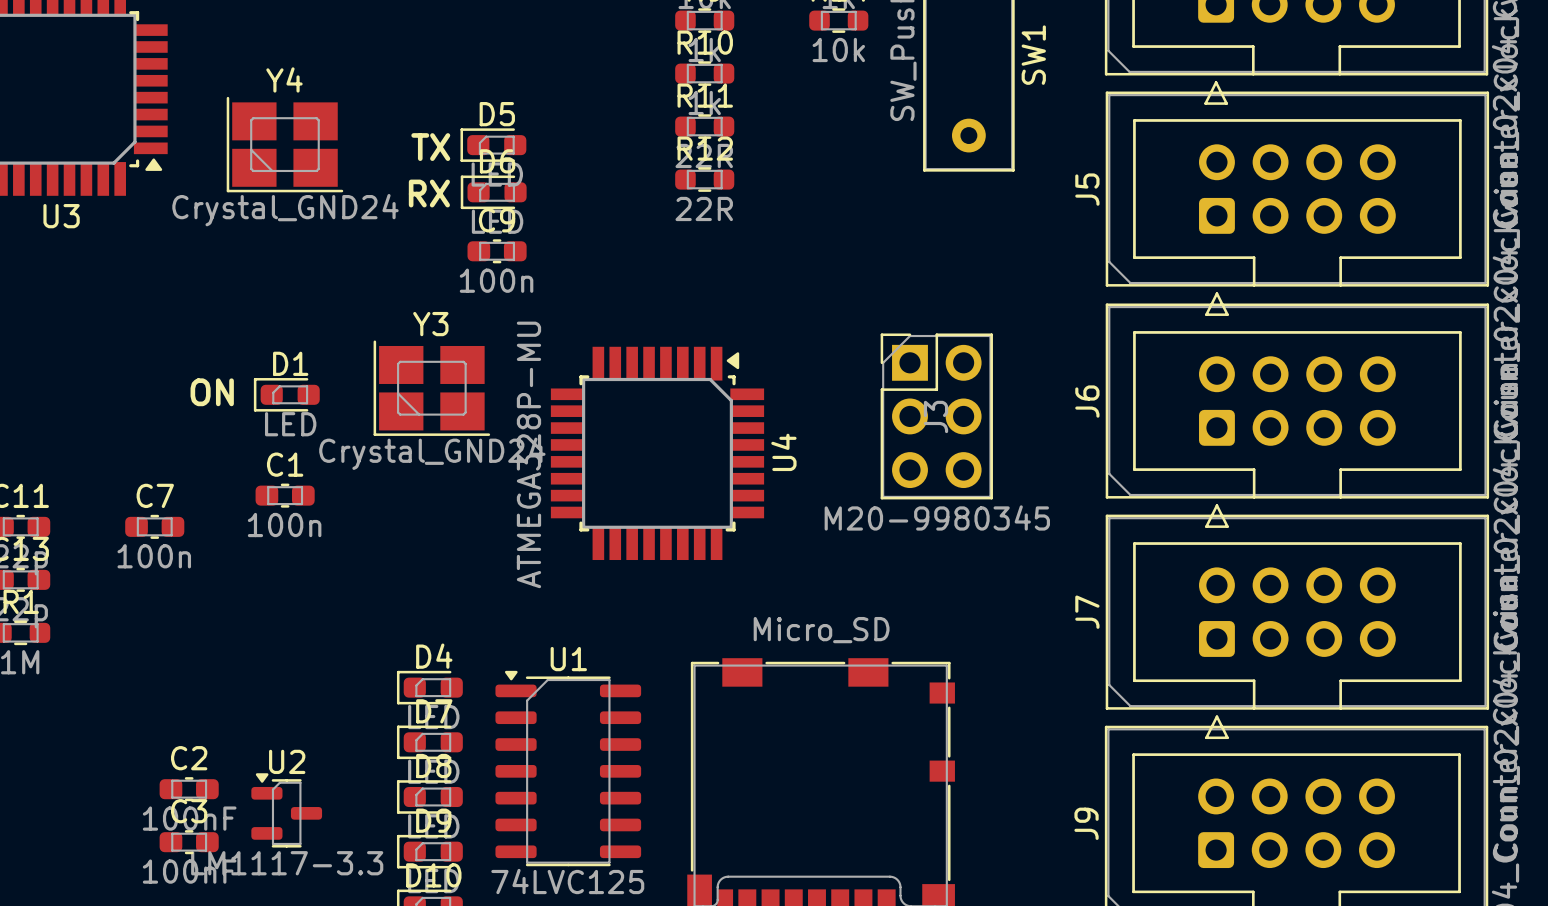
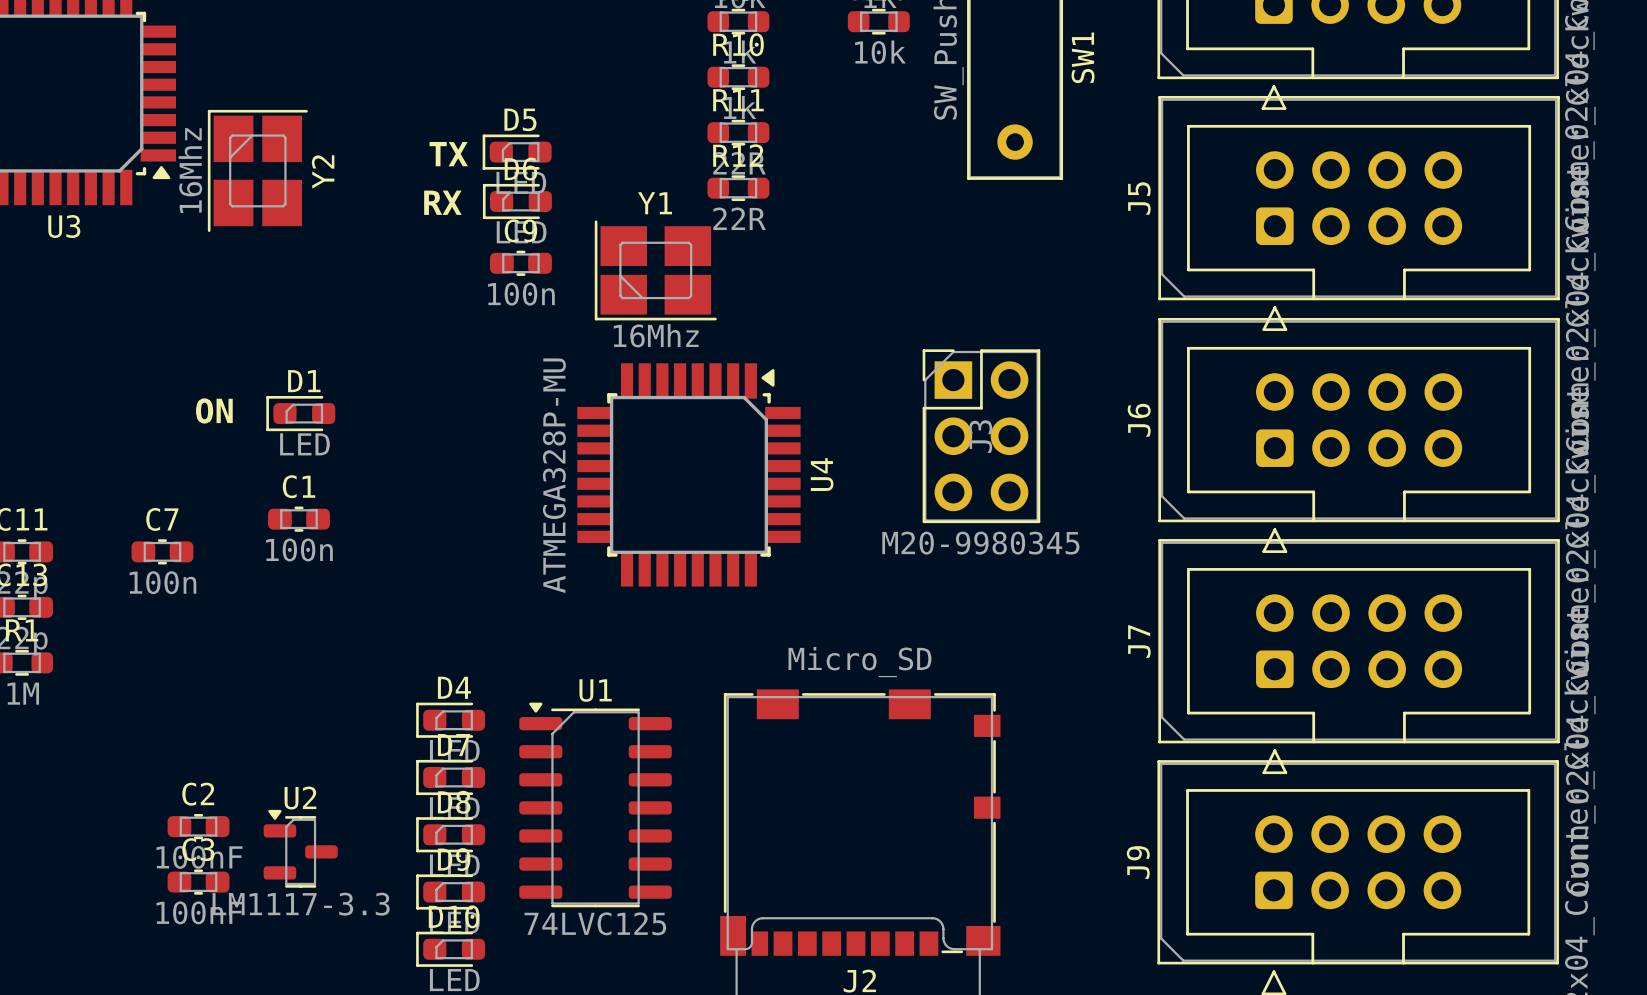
Y4: Crystal_GND24 (284, 144) -> none
Y2: none -> 16Mhz (257, 170)
Y1: none -> 16Mhz (655, 270)
Y3: Crystal_GND24 (431, 388) -> none

